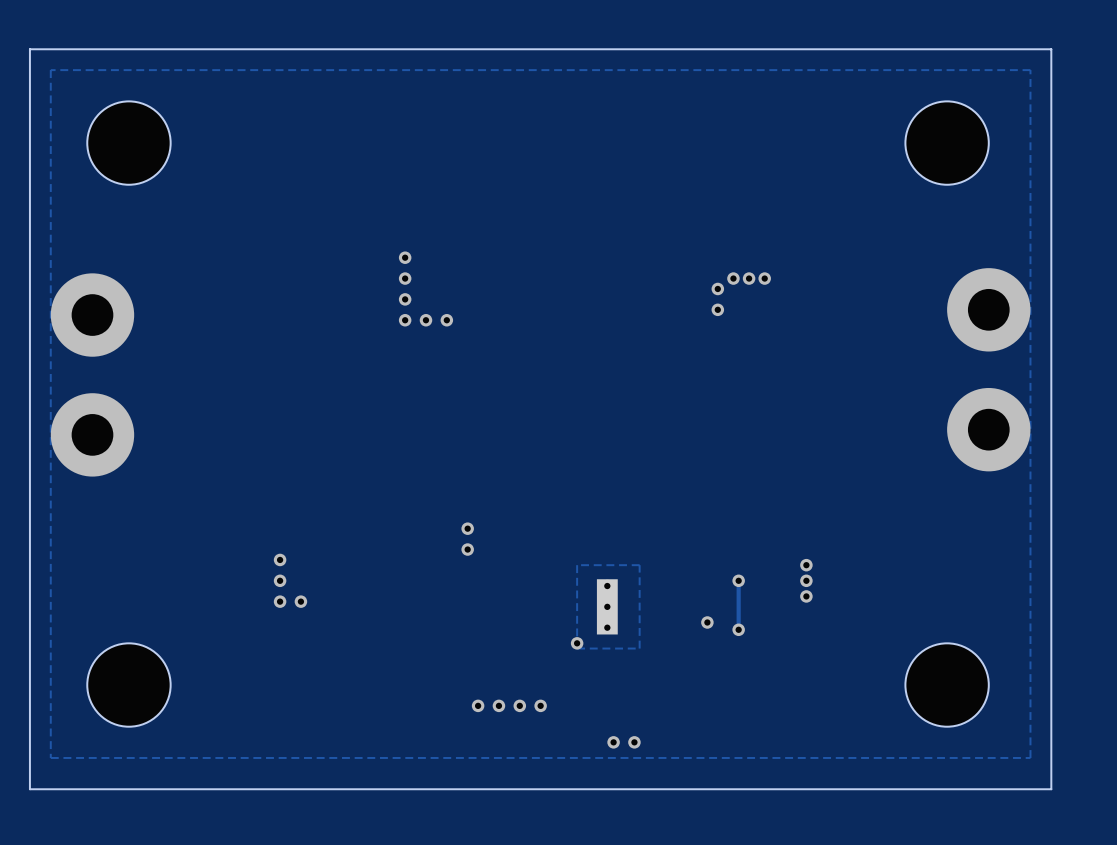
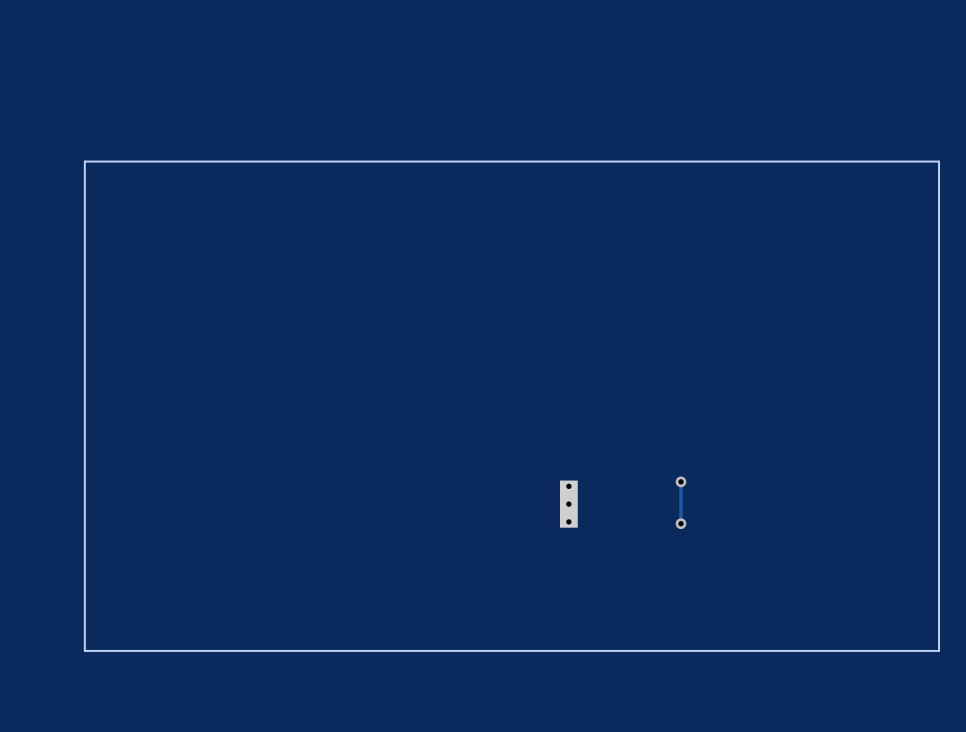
board edge: (1051, 49) (29, 49) (29, 789) (1051, 789) (1051, 49) -> (939, 161) (939, 650) (84, 650) (84, 161) (939, 161)
zone outline: (1030, 70) (50, 70) (50, 757) (1030, 757) (1030, 70) -> none
part: (128, 143) -> none
part: (947, 143) -> none
via: (405, 257) -> none
via: (405, 278) -> none
via: (733, 278) -> none
via: (749, 278) -> none
via: (764, 278) -> none
via: (717, 288) -> none
via: (405, 299) -> none
via: (717, 309) -> none
via: (988, 309) -> none
via: (92, 315) -> none
via: (405, 320) -> none
via: (425, 320) -> none
via: (446, 320) -> none
via: (988, 429) -> none
via: (92, 434) -> none
via: (467, 528) -> none
via: (467, 549) -> none
via: (280, 559) -> none
zone outline: (639, 565) (577, 565) (577, 648) (639, 648) (639, 565) -> none
via: (806, 565) -> none
via: (280, 580) -> none
via: (806, 580) -> none
via: (806, 596) -> none
via: (280, 601) -> none
via: (300, 601) -> none
via: (707, 622) -> none
via: (577, 643) -> none
part: (128, 685) -> none
part: (947, 685) -> none
via: (478, 705) -> none
via: (498, 705) -> none
via: (519, 705) -> none
via: (540, 705) -> none
via: (613, 742) -> none
via: (634, 742) -> none

